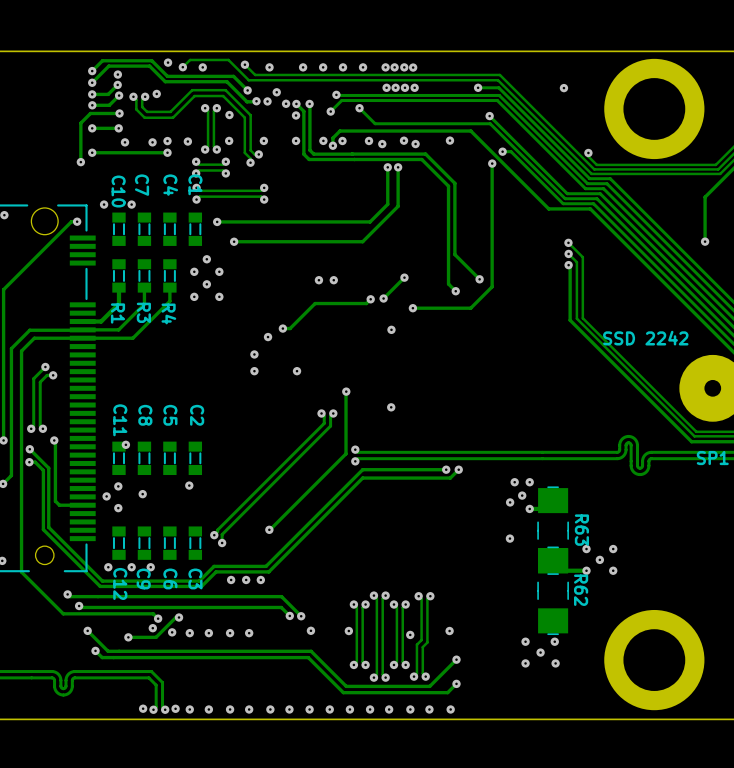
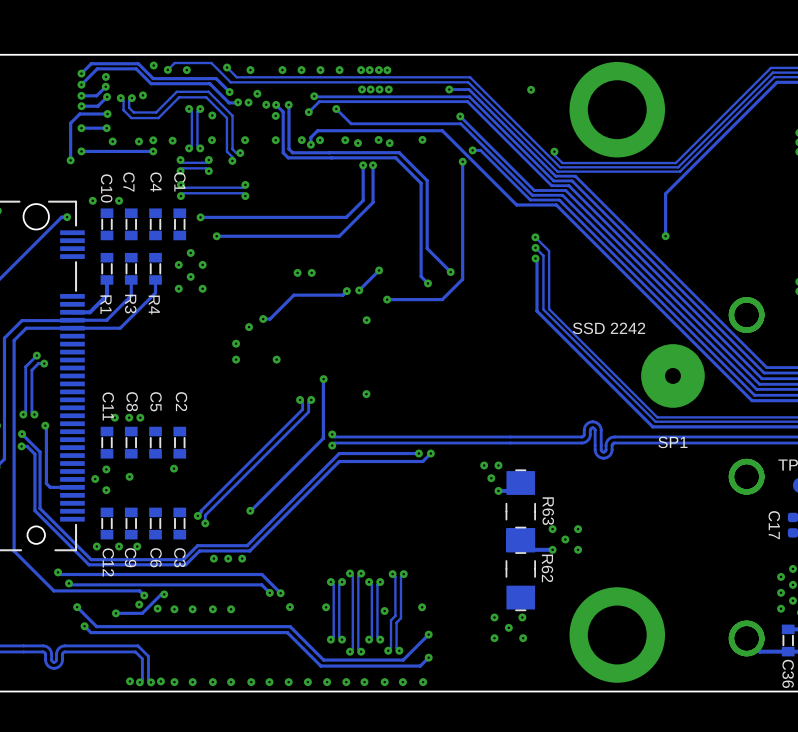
via: none -> (114, 417)
via: none -> (129, 417)
via: none -> (140, 417)
via: (125, 444) -> none
via: (510, 502) -> none
via: (509, 538) -> none

